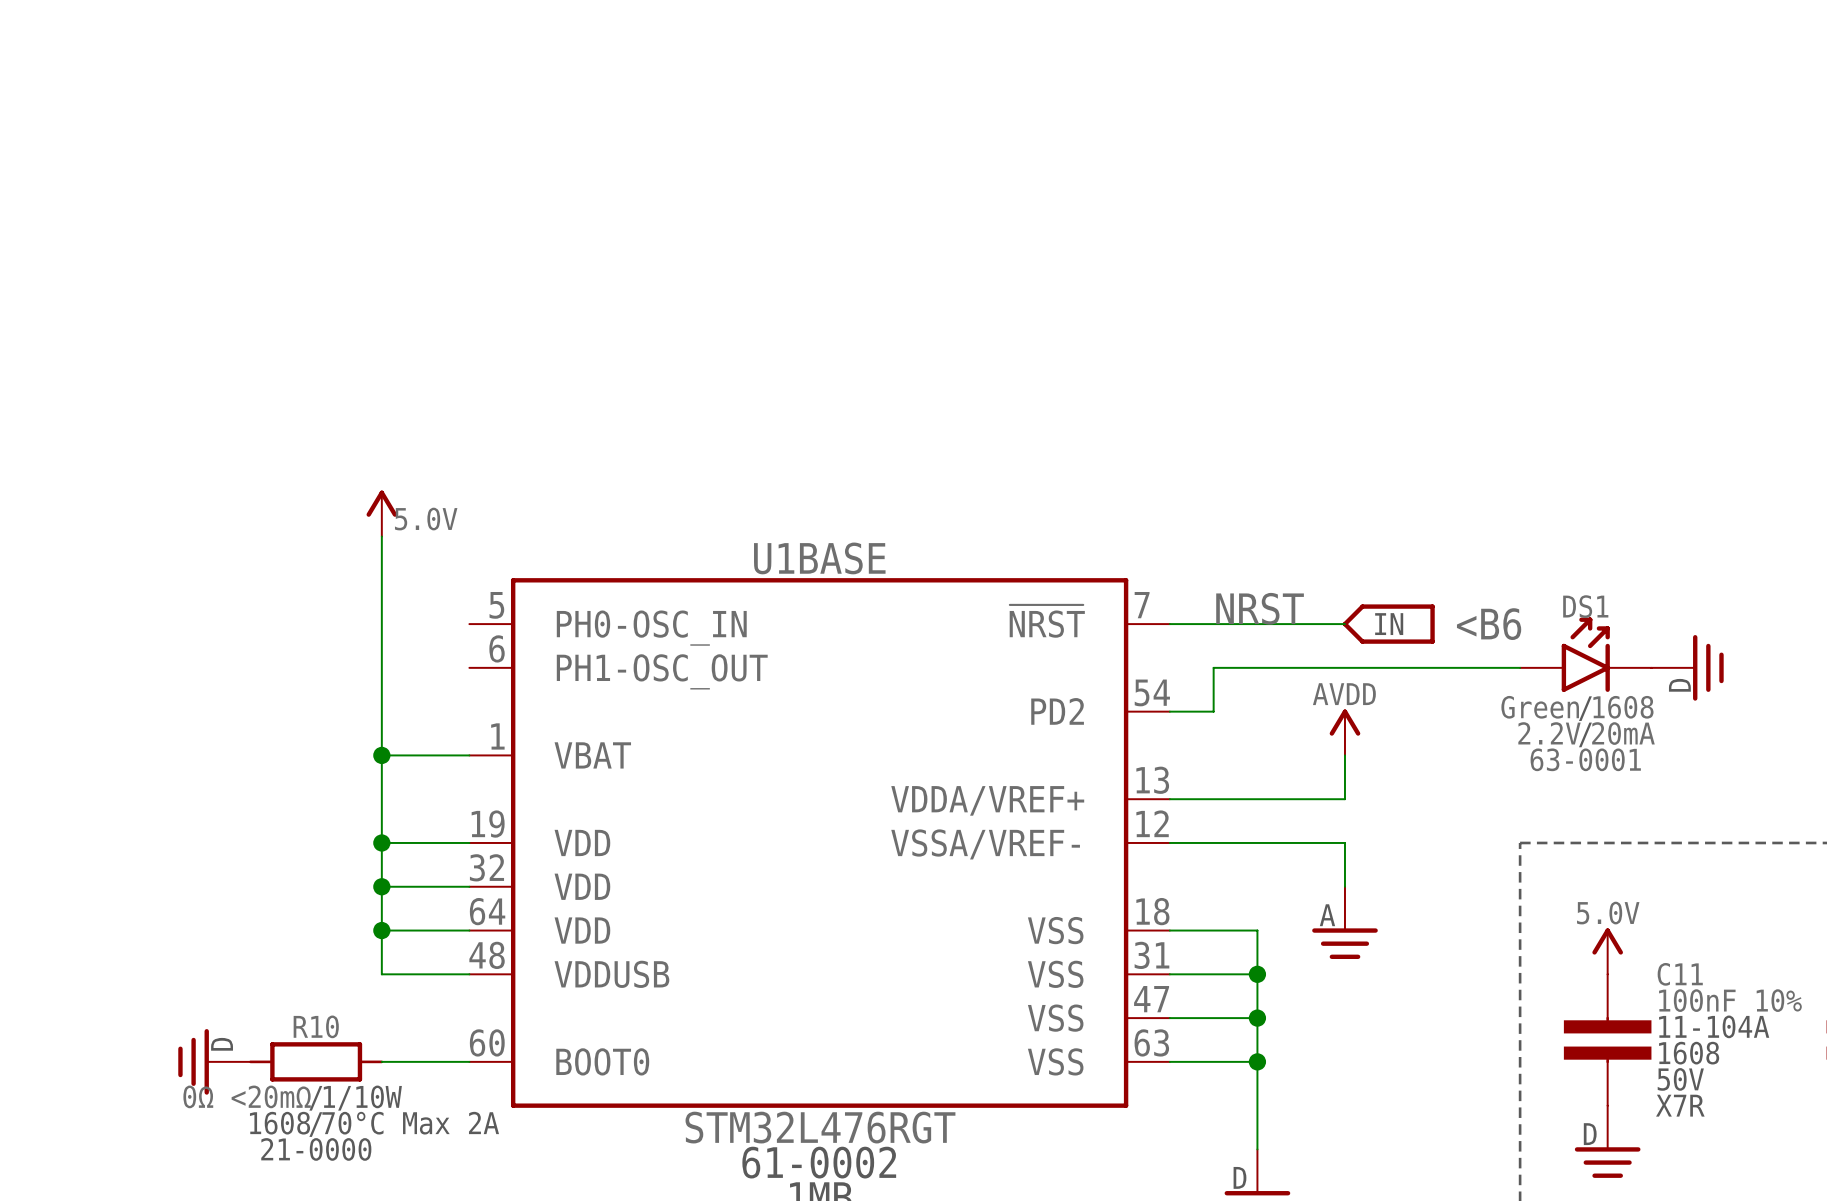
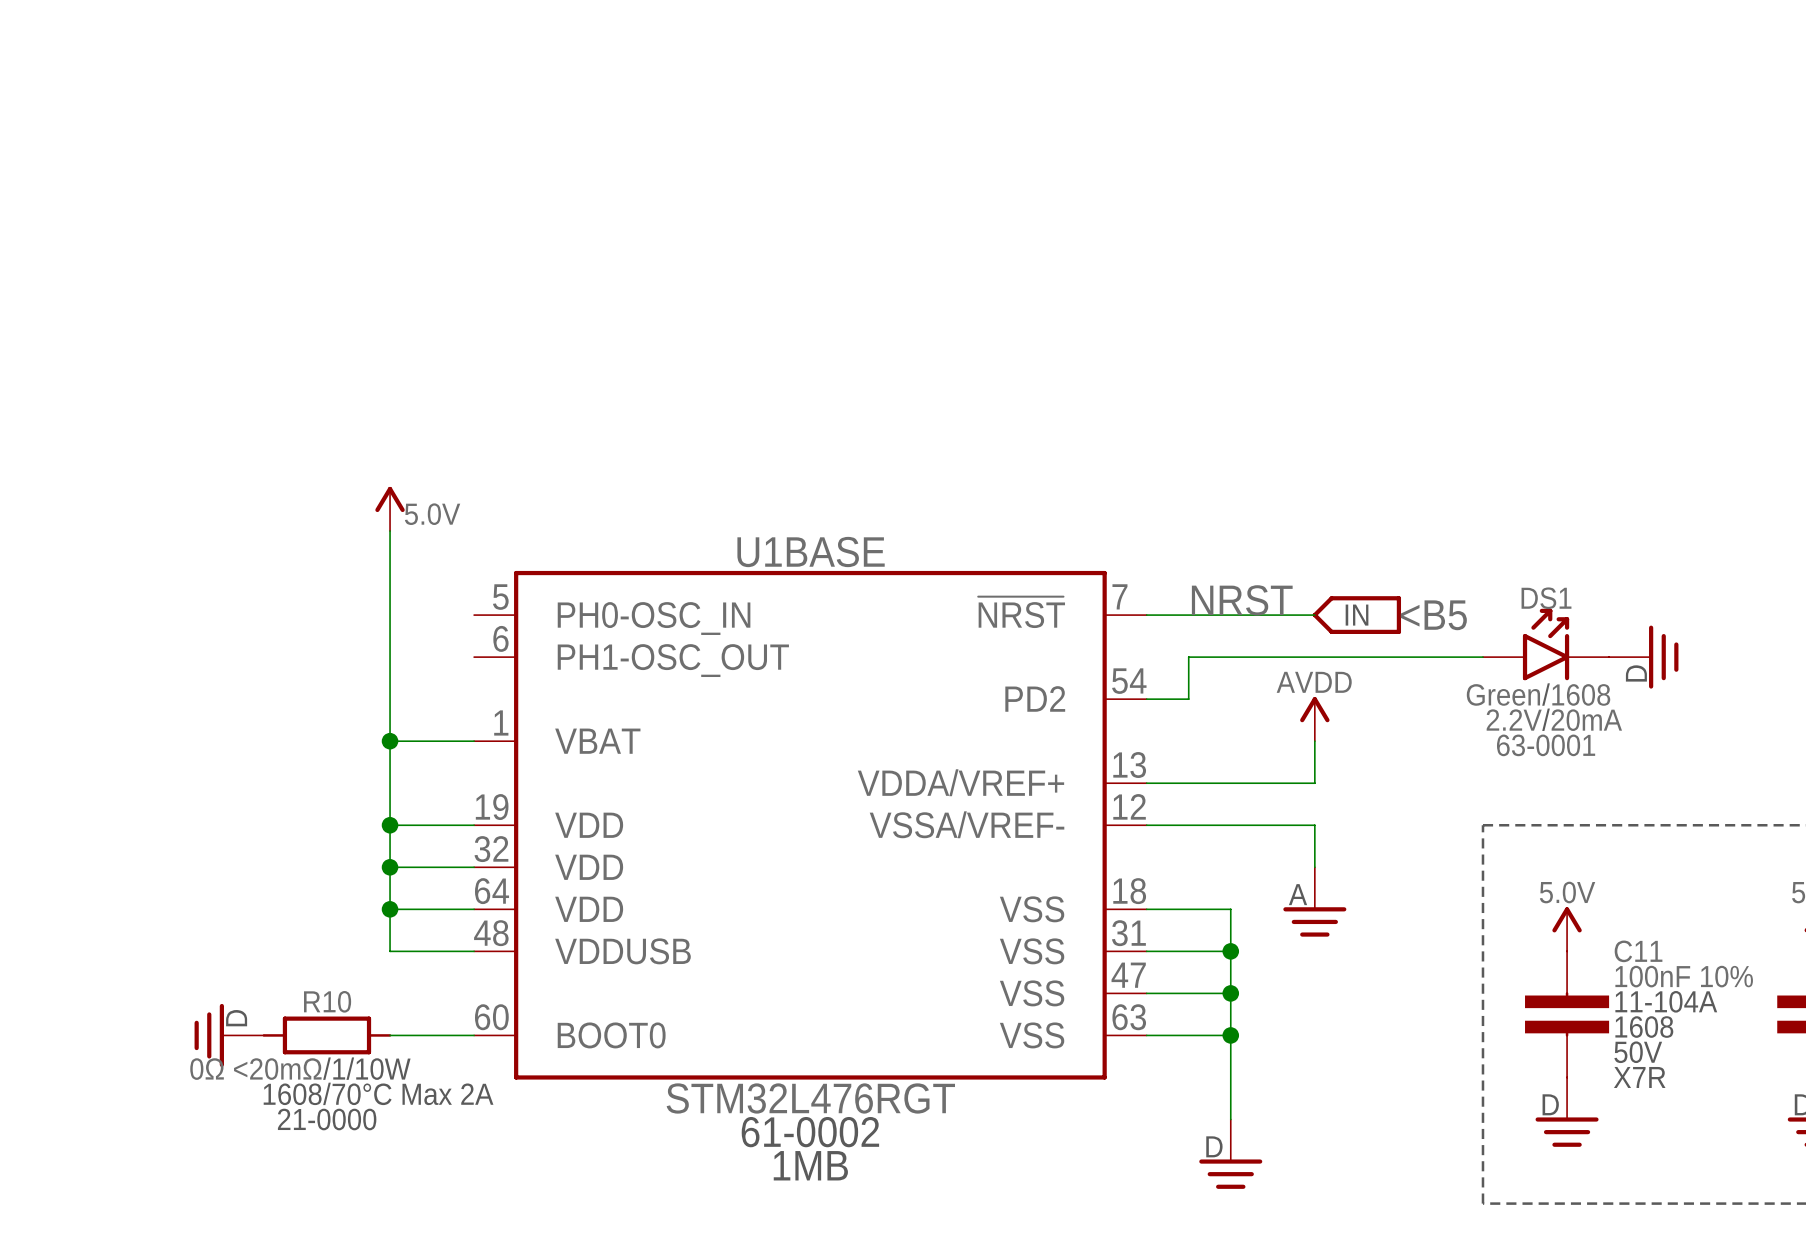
text: <B6 (1489, 624) -> <B5 (1433, 615)

